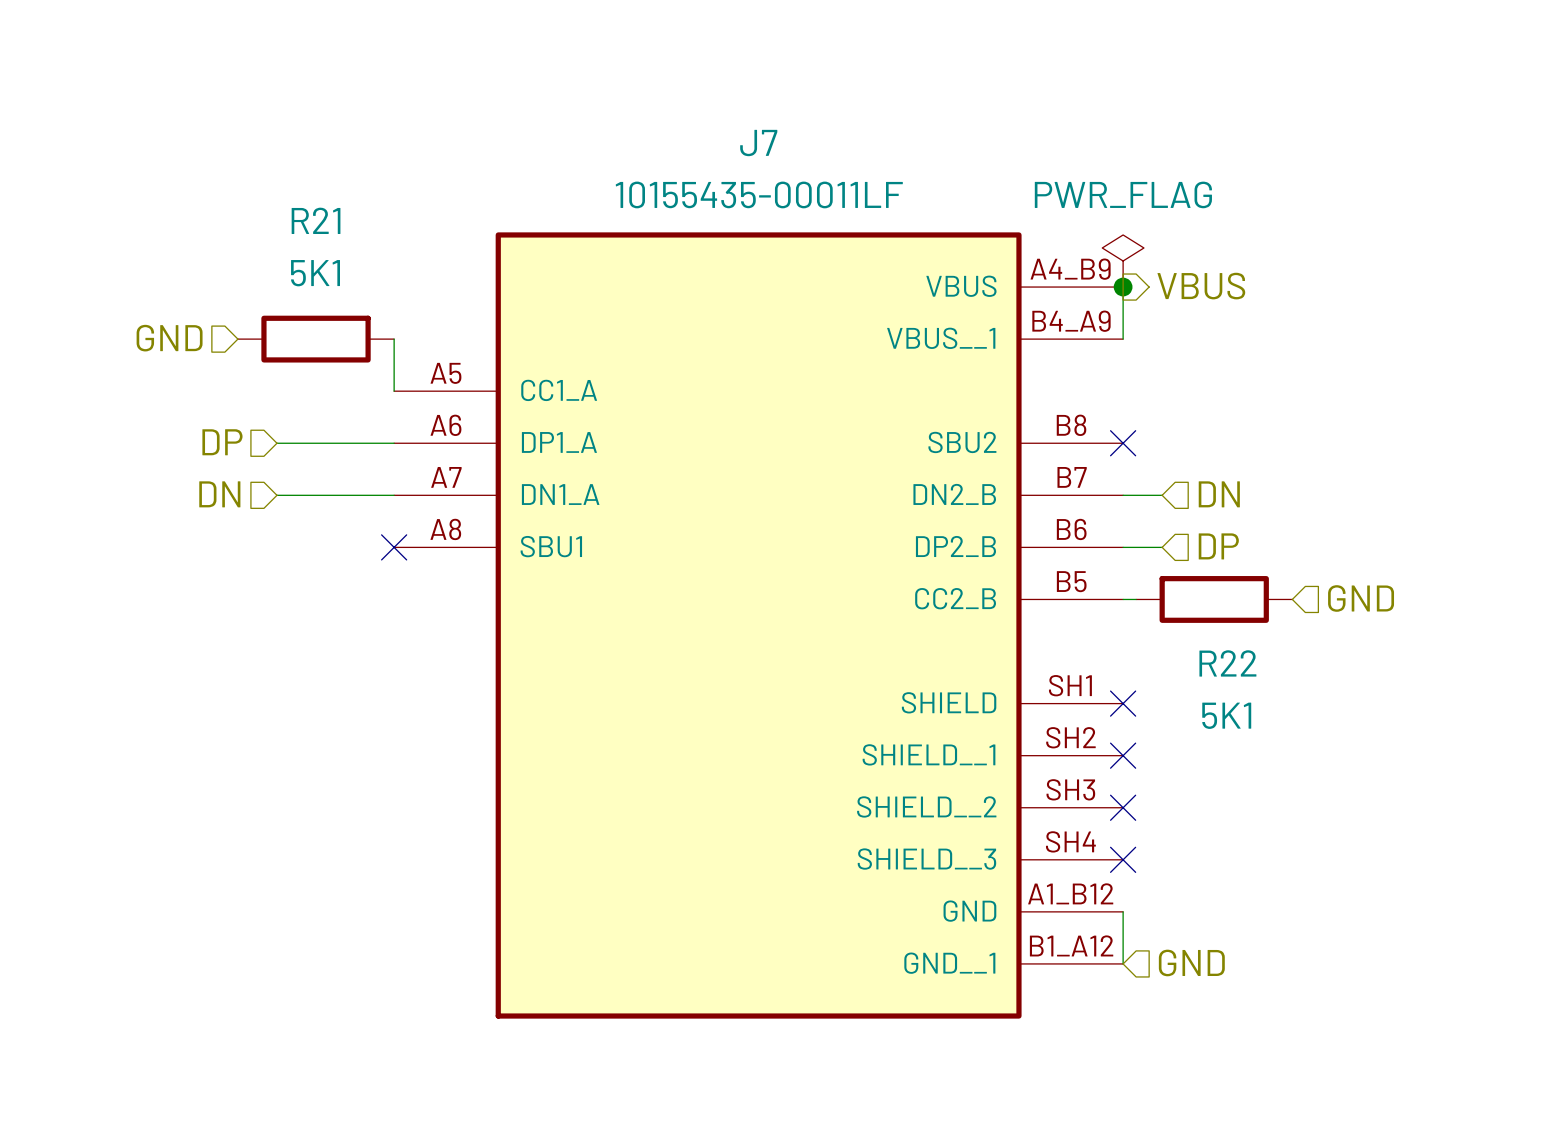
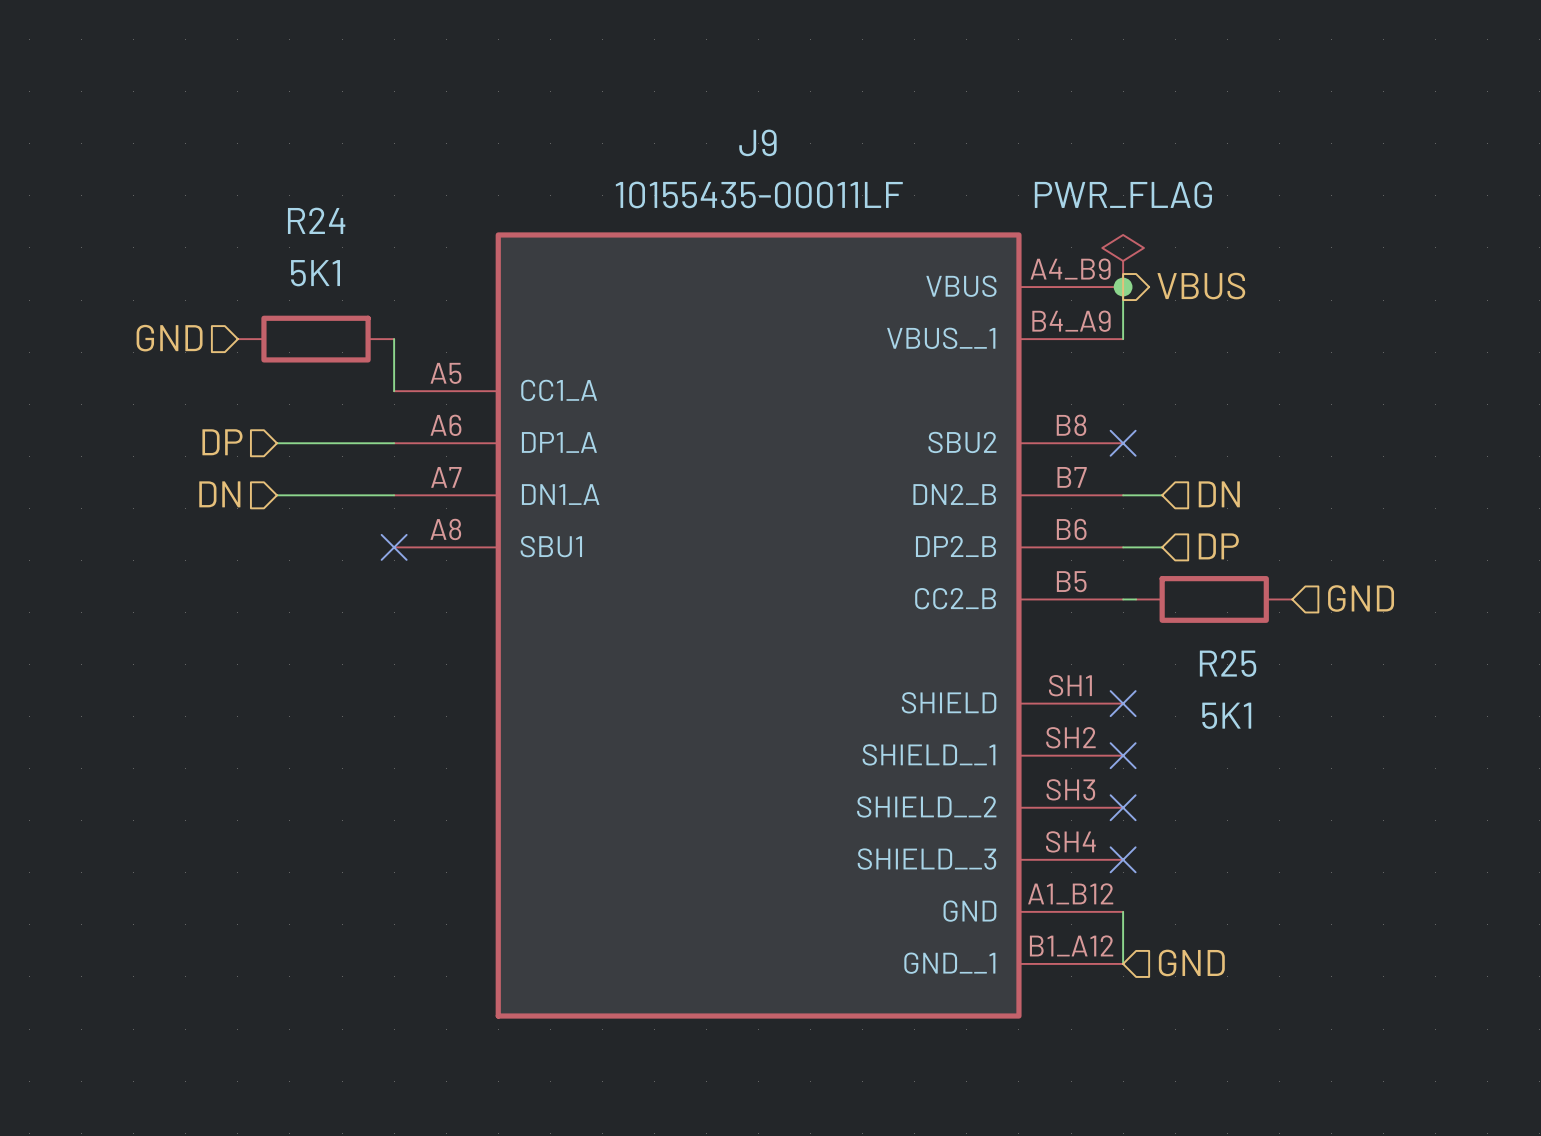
J7 name: J7 (758, 143) -> J9 (757, 142)
R21 name: R21 (316, 220) -> R24 (316, 220)
R22 name: R22 (1227, 663) -> R25 (1228, 663)

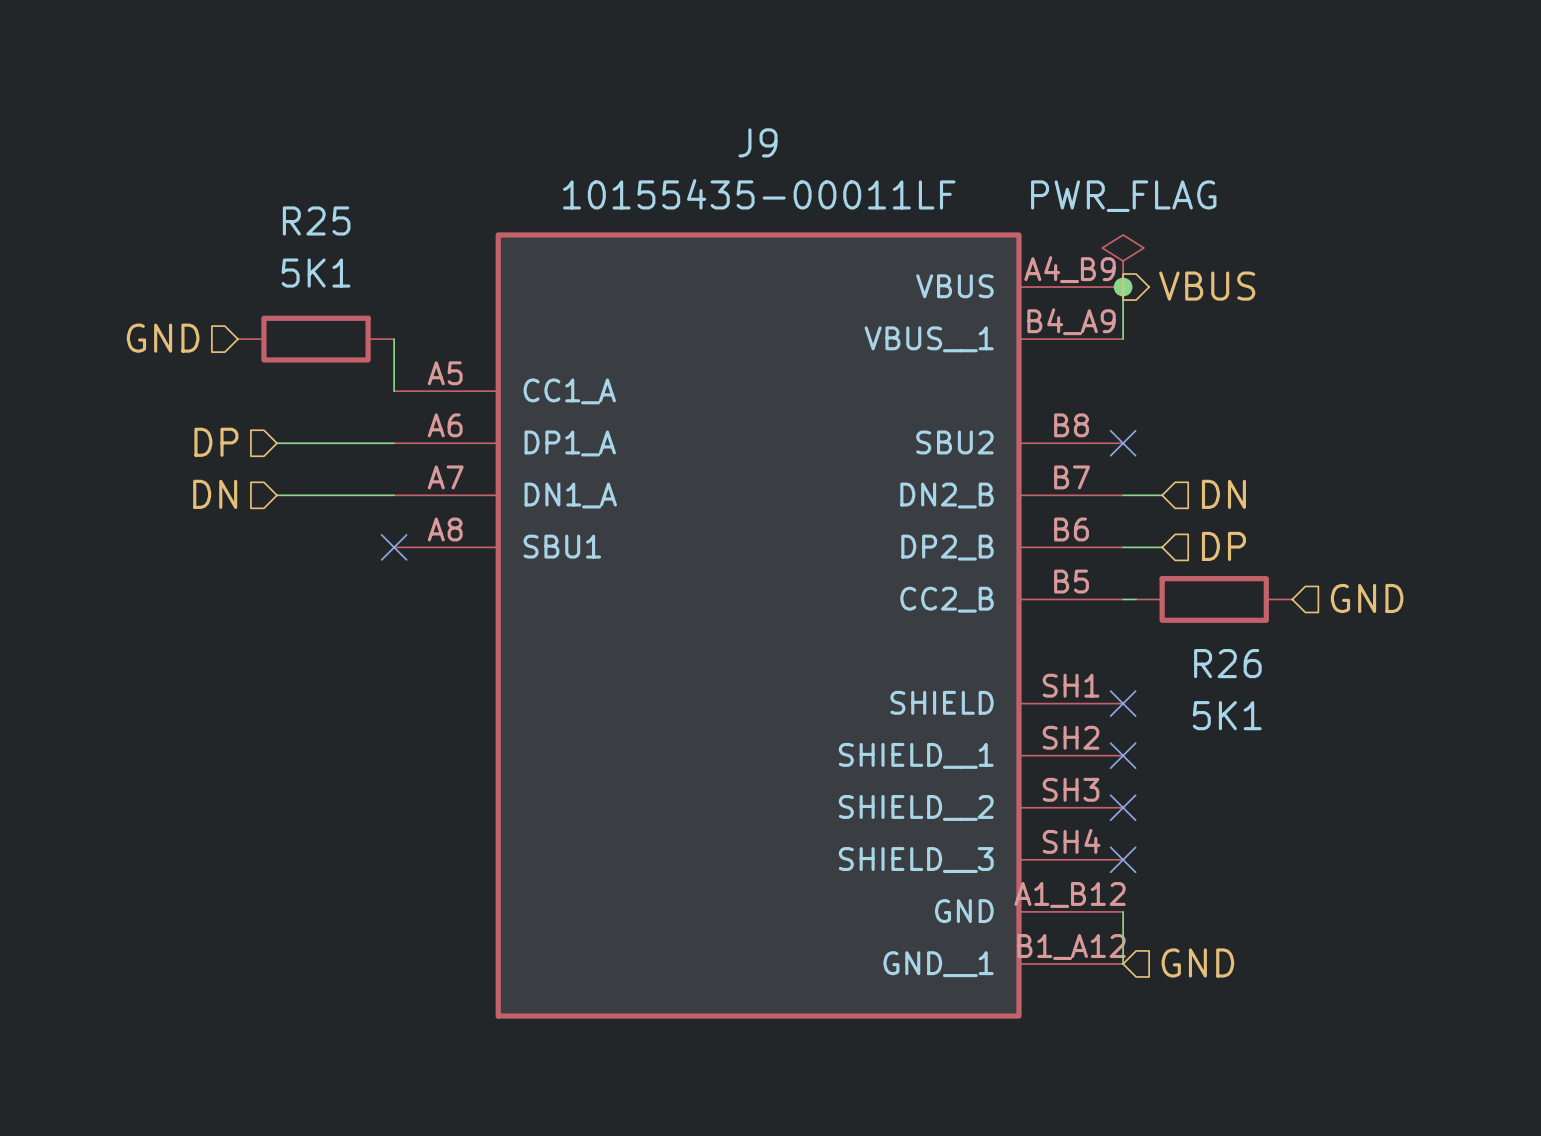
R24 name: R24 (316, 220) -> R25 (316, 220)
R25 name: R25 (1228, 663) -> R26 (1227, 663)

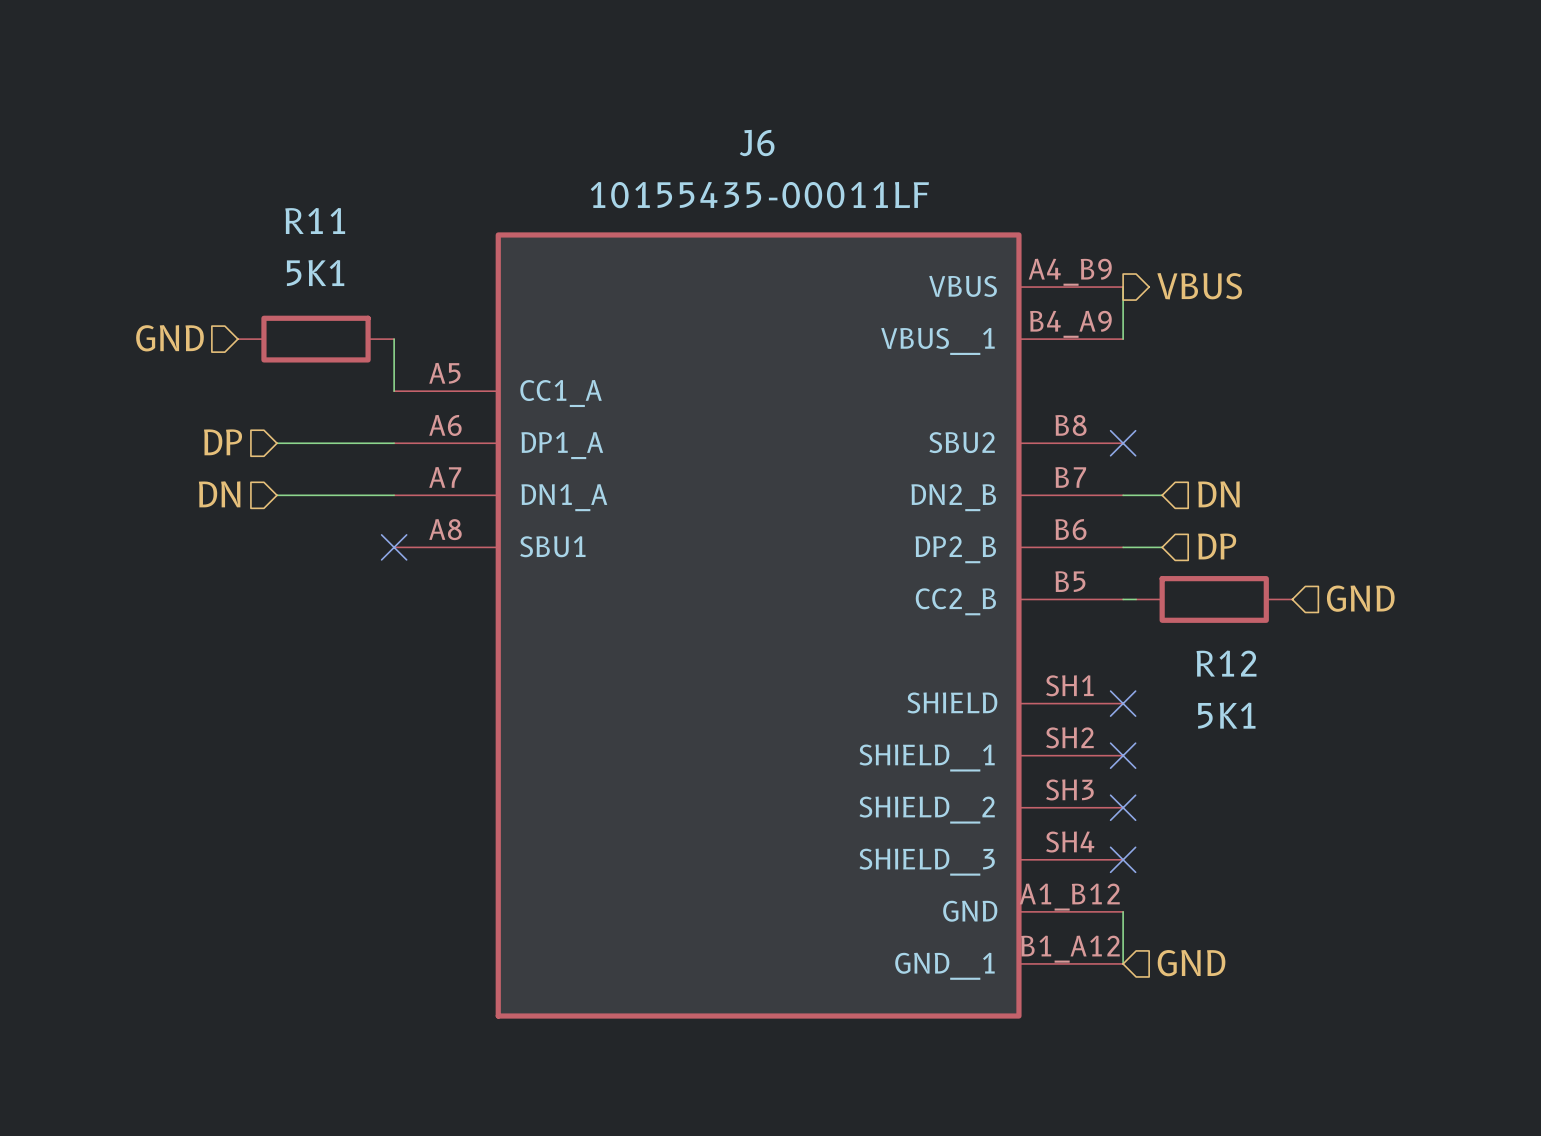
J9 name: J9 (758, 142) -> J6 (757, 143)
R25 name: R25 (316, 220) -> R11 (315, 220)
power symbol: PWR_FLAG (1123, 261) -> none
junction: (1123, 287) -> none
R26 name: R26 (1227, 663) -> R12 (1226, 663)

